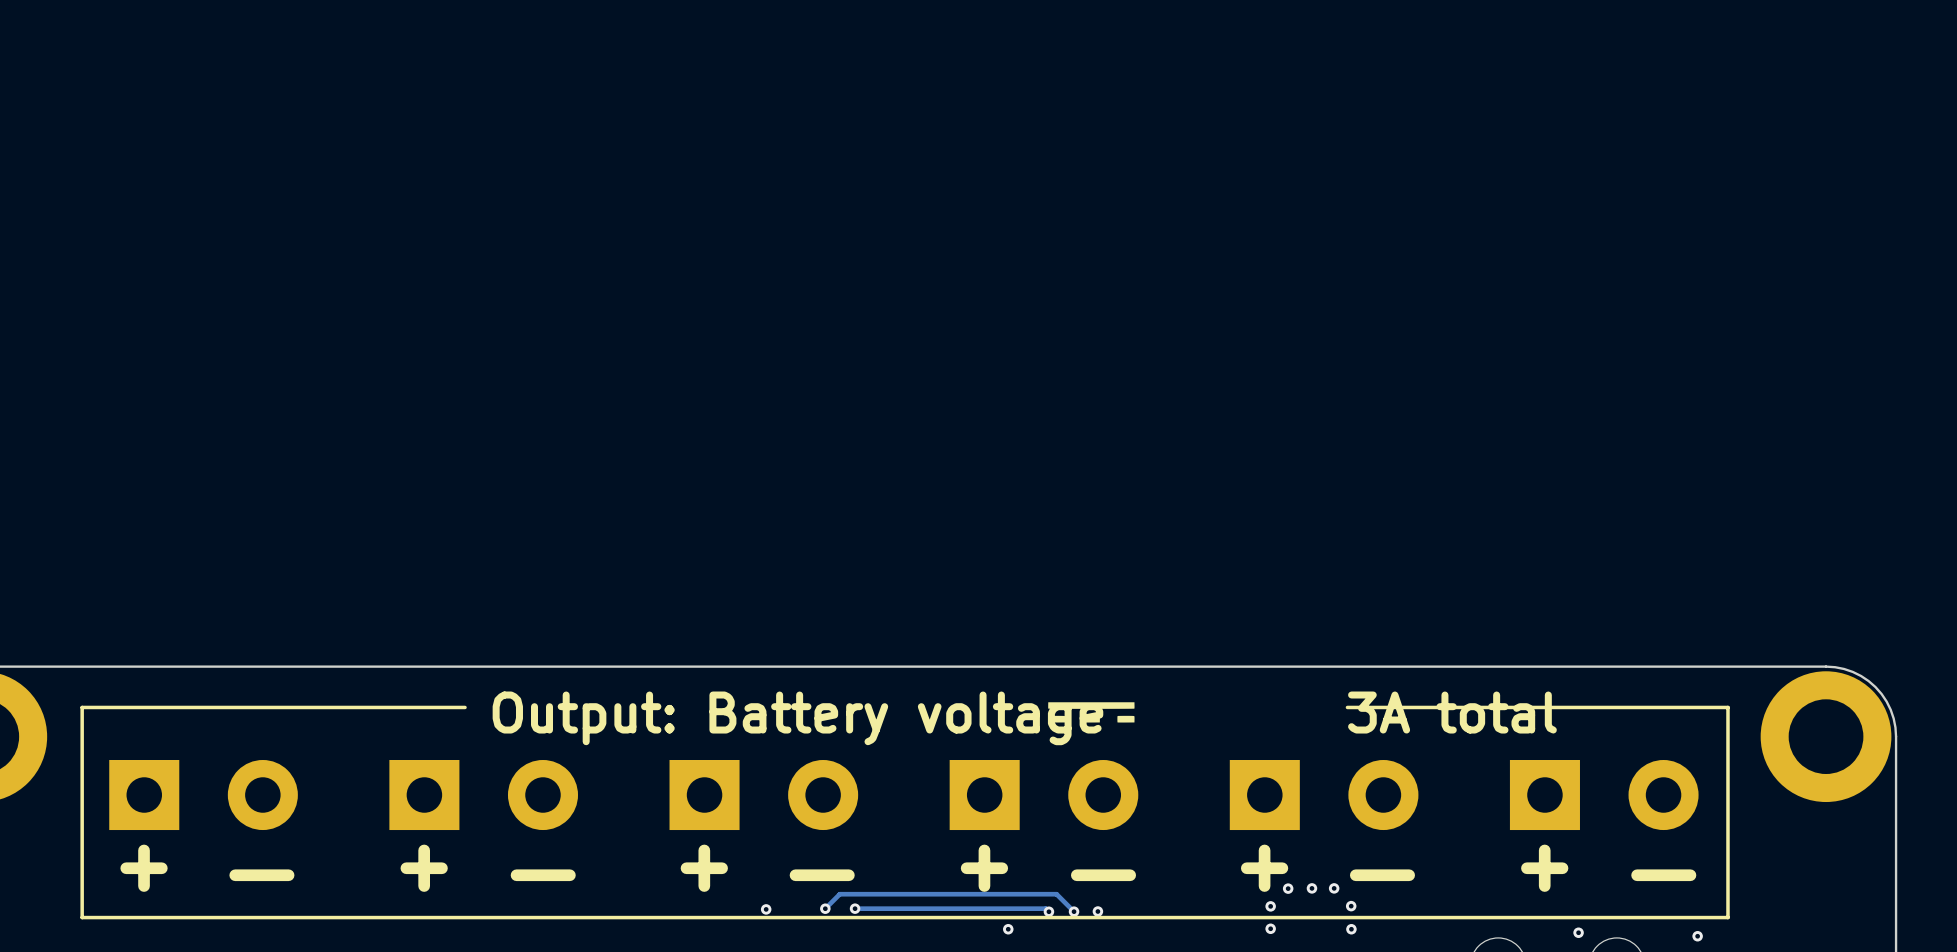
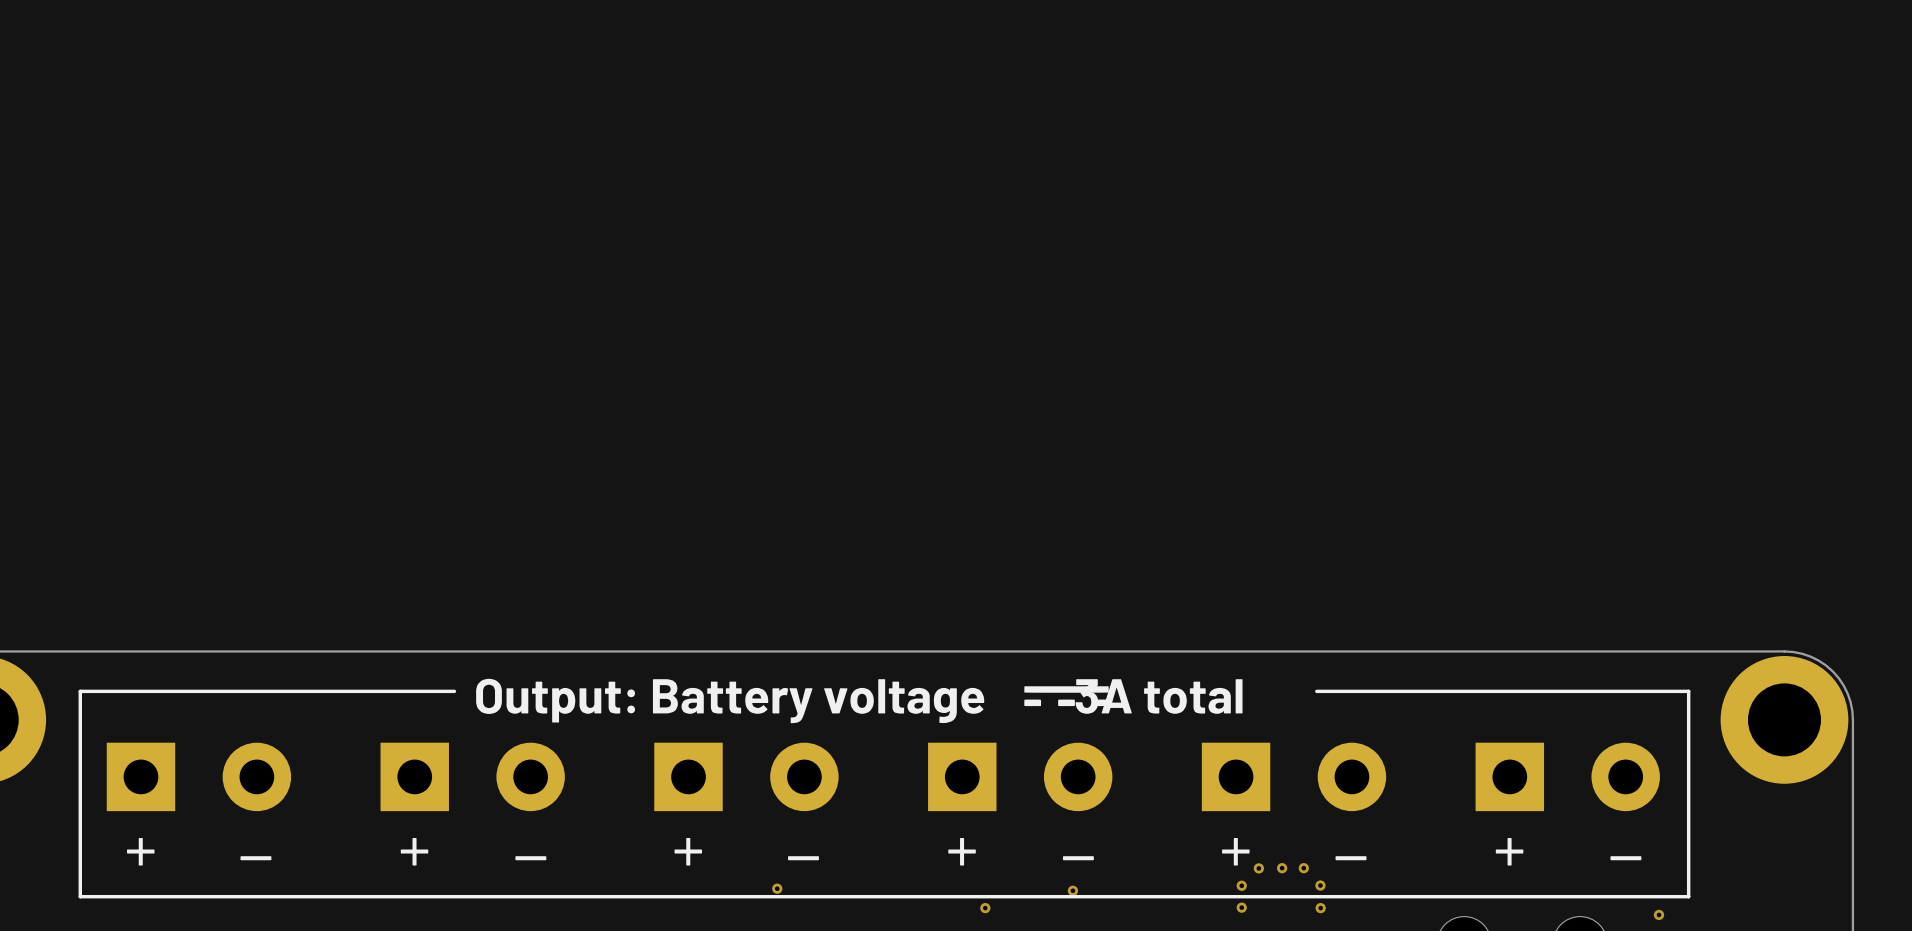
track: (825, 908) (839, 894) (1056, 894) (1074, 911) -> none
via: (825, 908) -> none
track: (855, 908) (1045, 908) (1048, 911) -> none
via: (855, 908) -> none
via: (766, 909) -> none
via: none -> (777, 888)
via: (1048, 911) -> none
via: (1074, 911) -> none
via: (1578, 932) -> none

